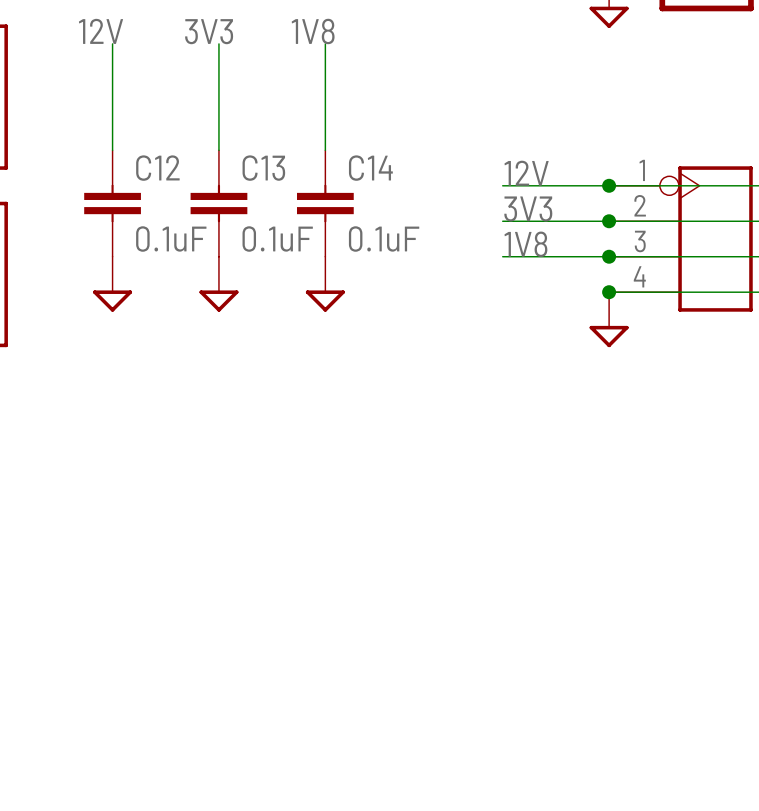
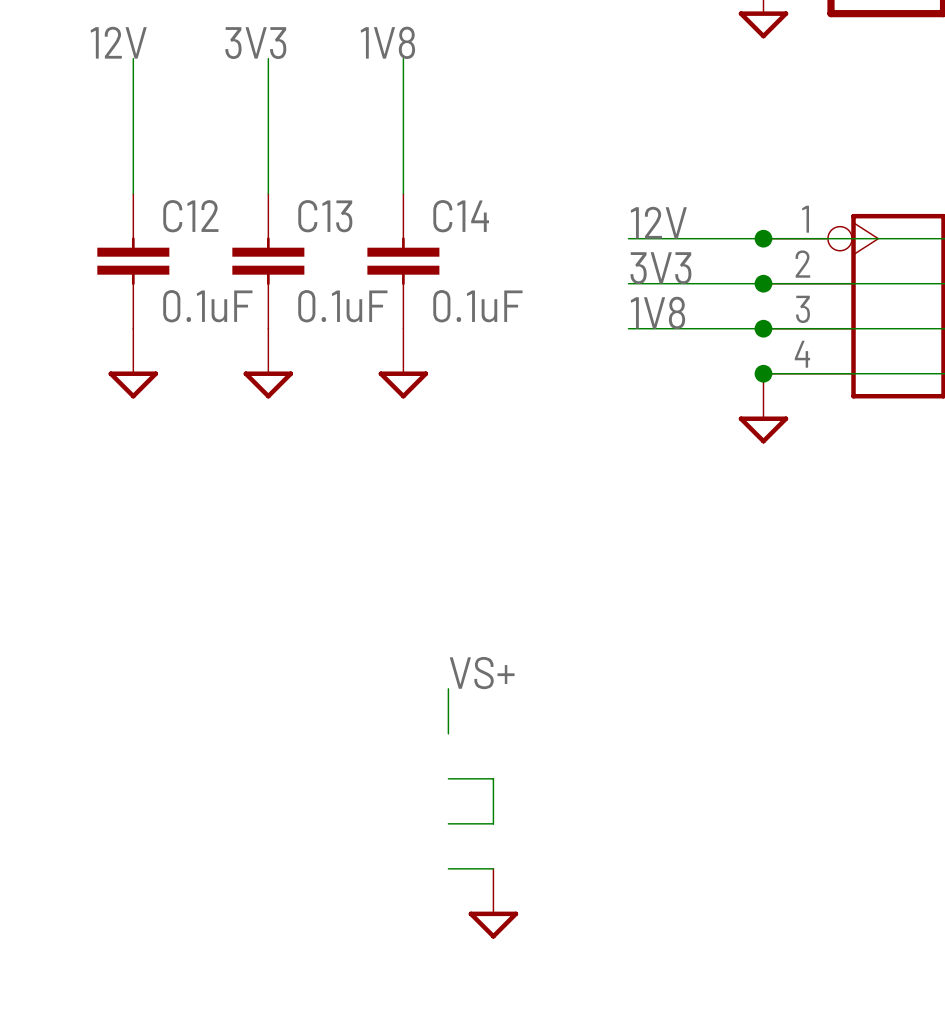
label: none -> VS+ (482, 673)
wire: none -> (448, 688) (448, 733)
wire: none -> (448, 778) (493, 778) (493, 823) (448, 823)
wire: none -> (448, 868) (493, 868)
power symbol: none -> (493, 903)

